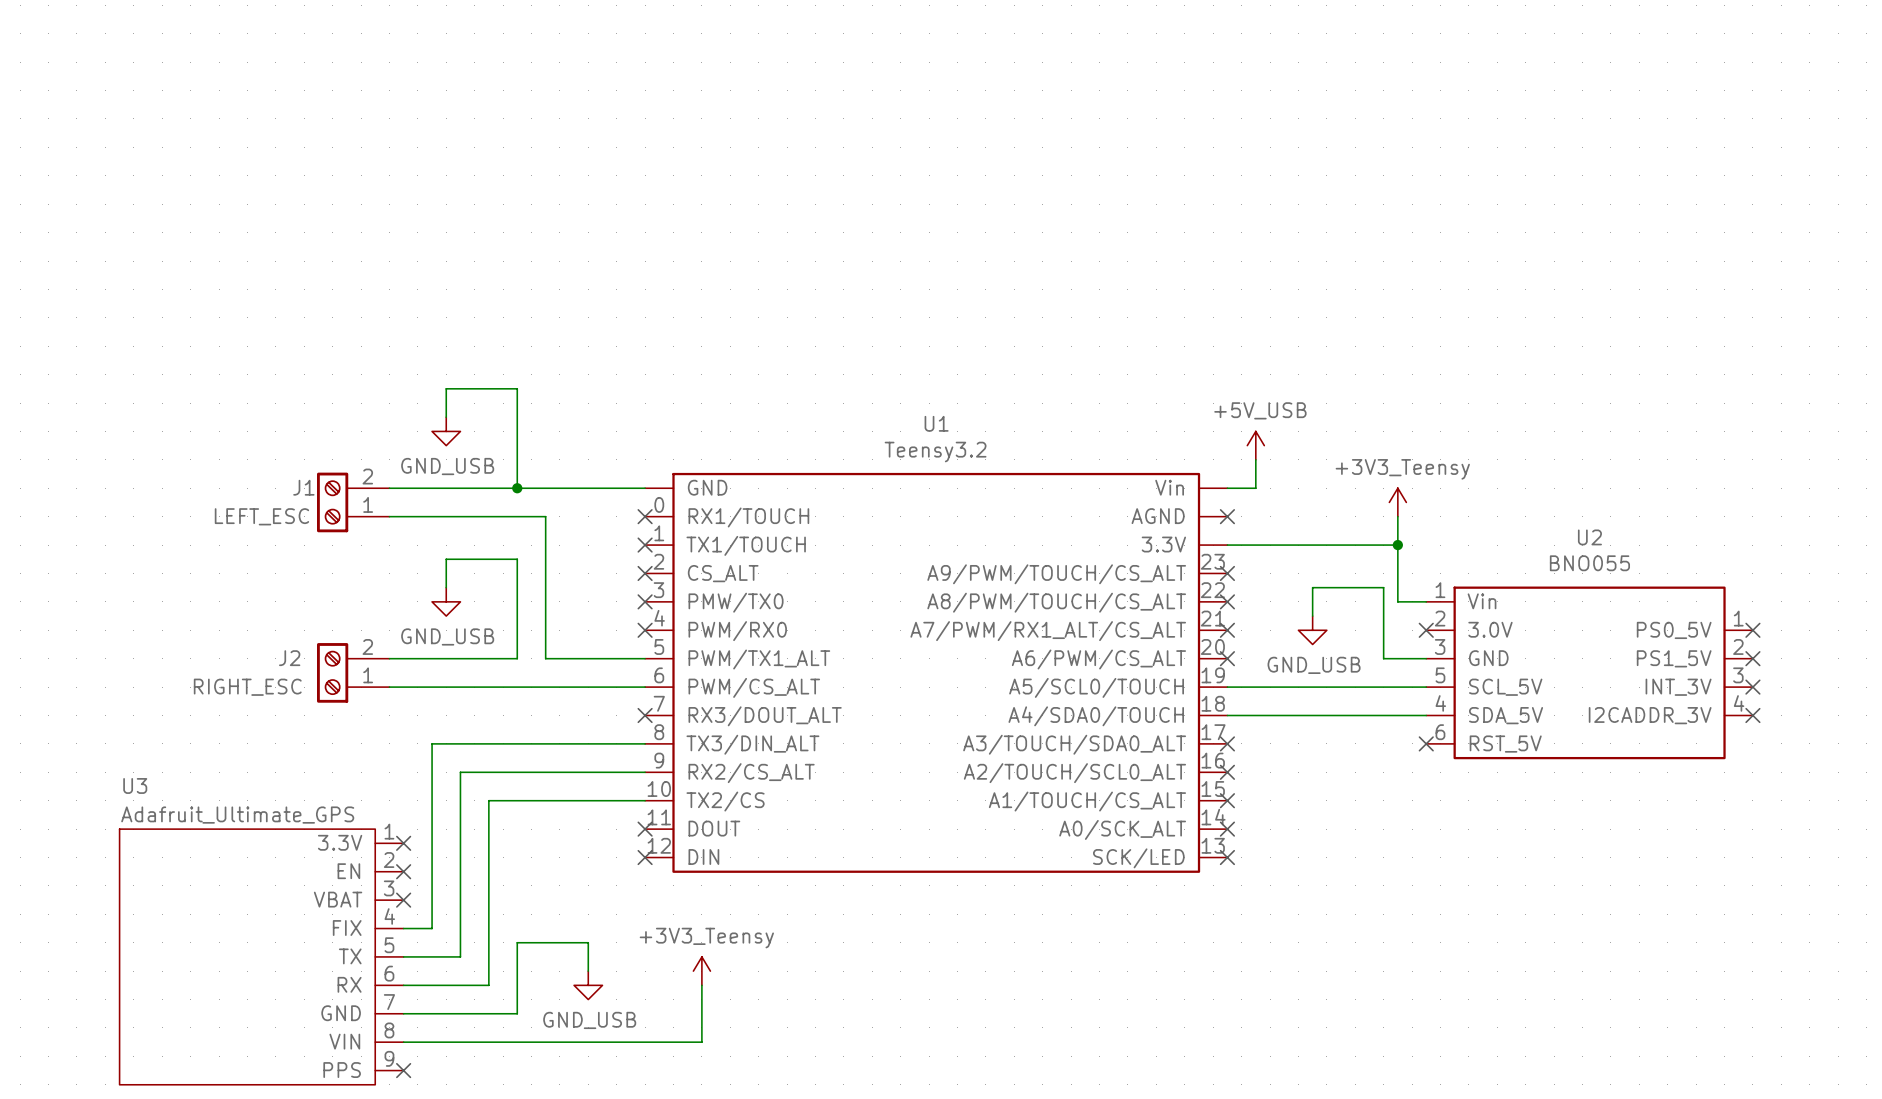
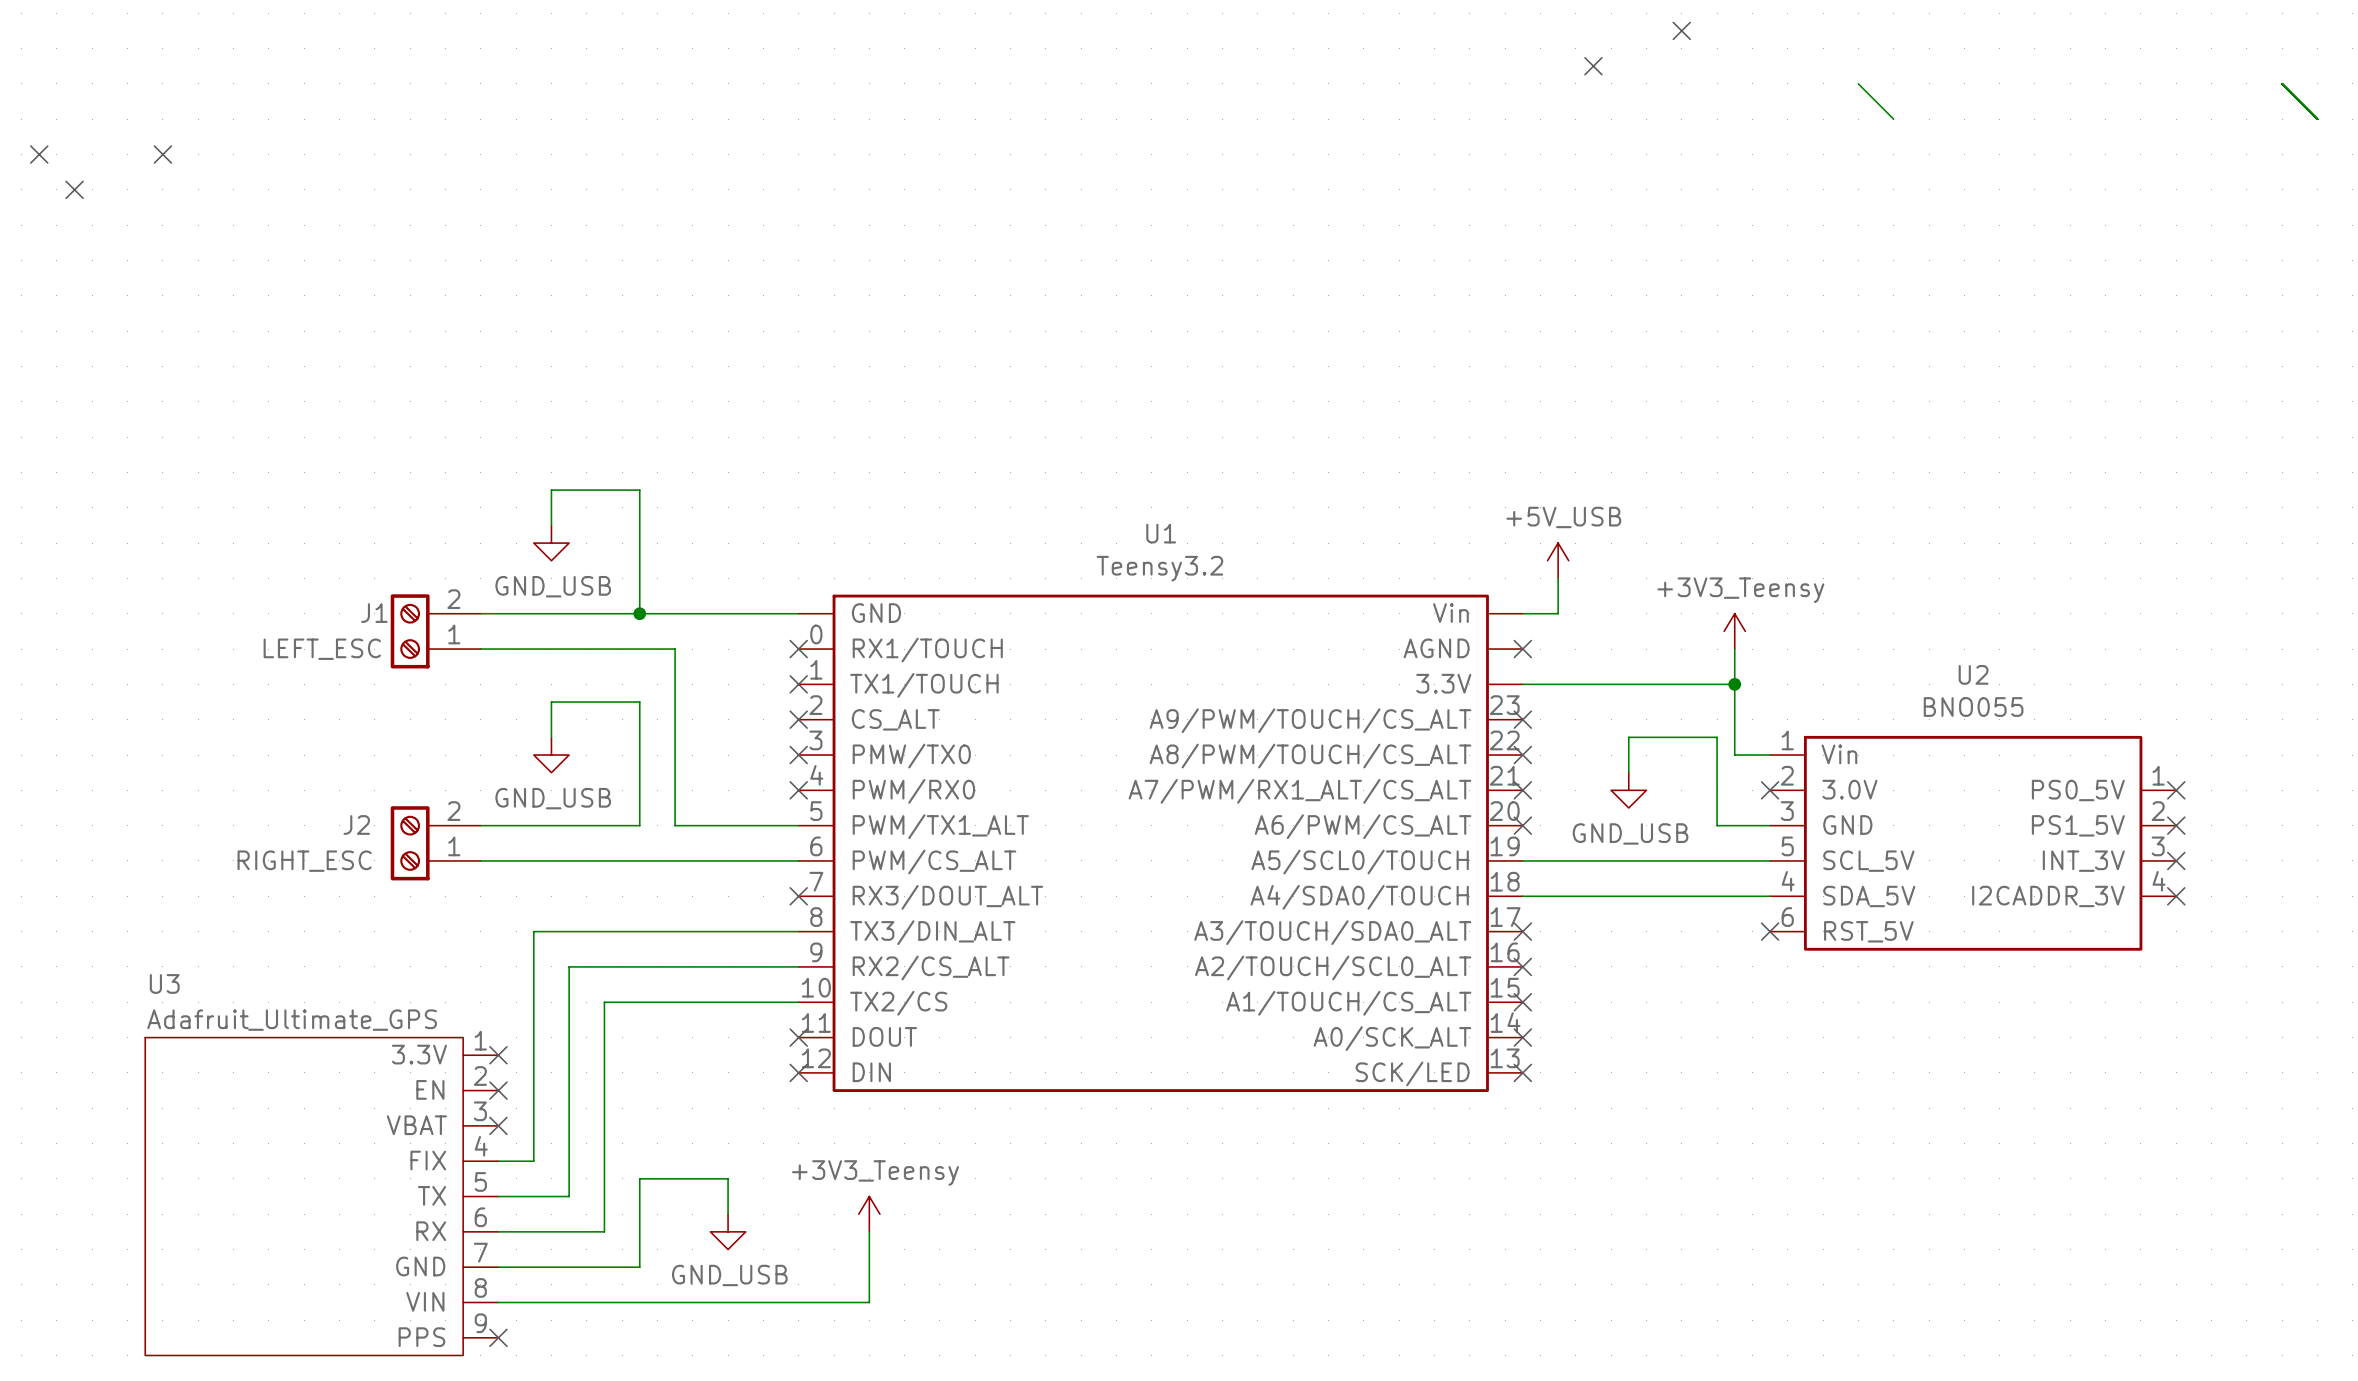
no-connect mark: none -> (1681, 30)
no-connect mark: none -> (1593, 66)
wire: none -> (1858, 83) (1893, 119)
wire: none -> (2282, 83) (2317, 119)
no-connect mark: none -> (39, 154)
no-connect mark: none -> (162, 154)
no-connect mark: none -> (74, 189)

